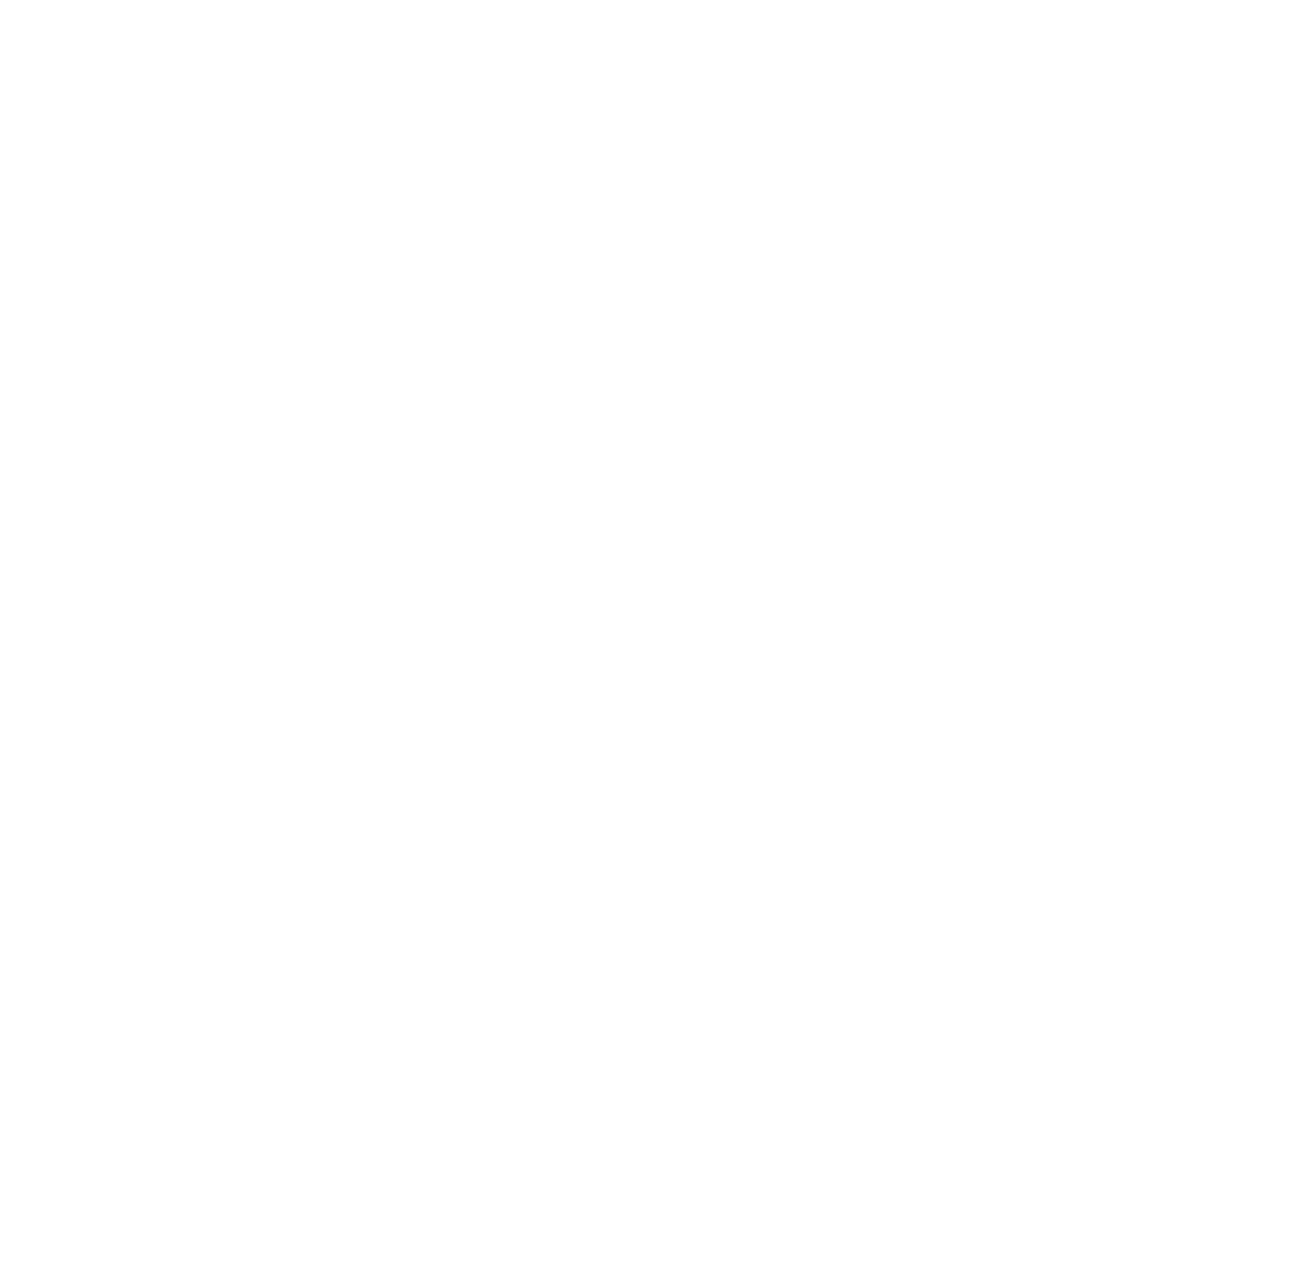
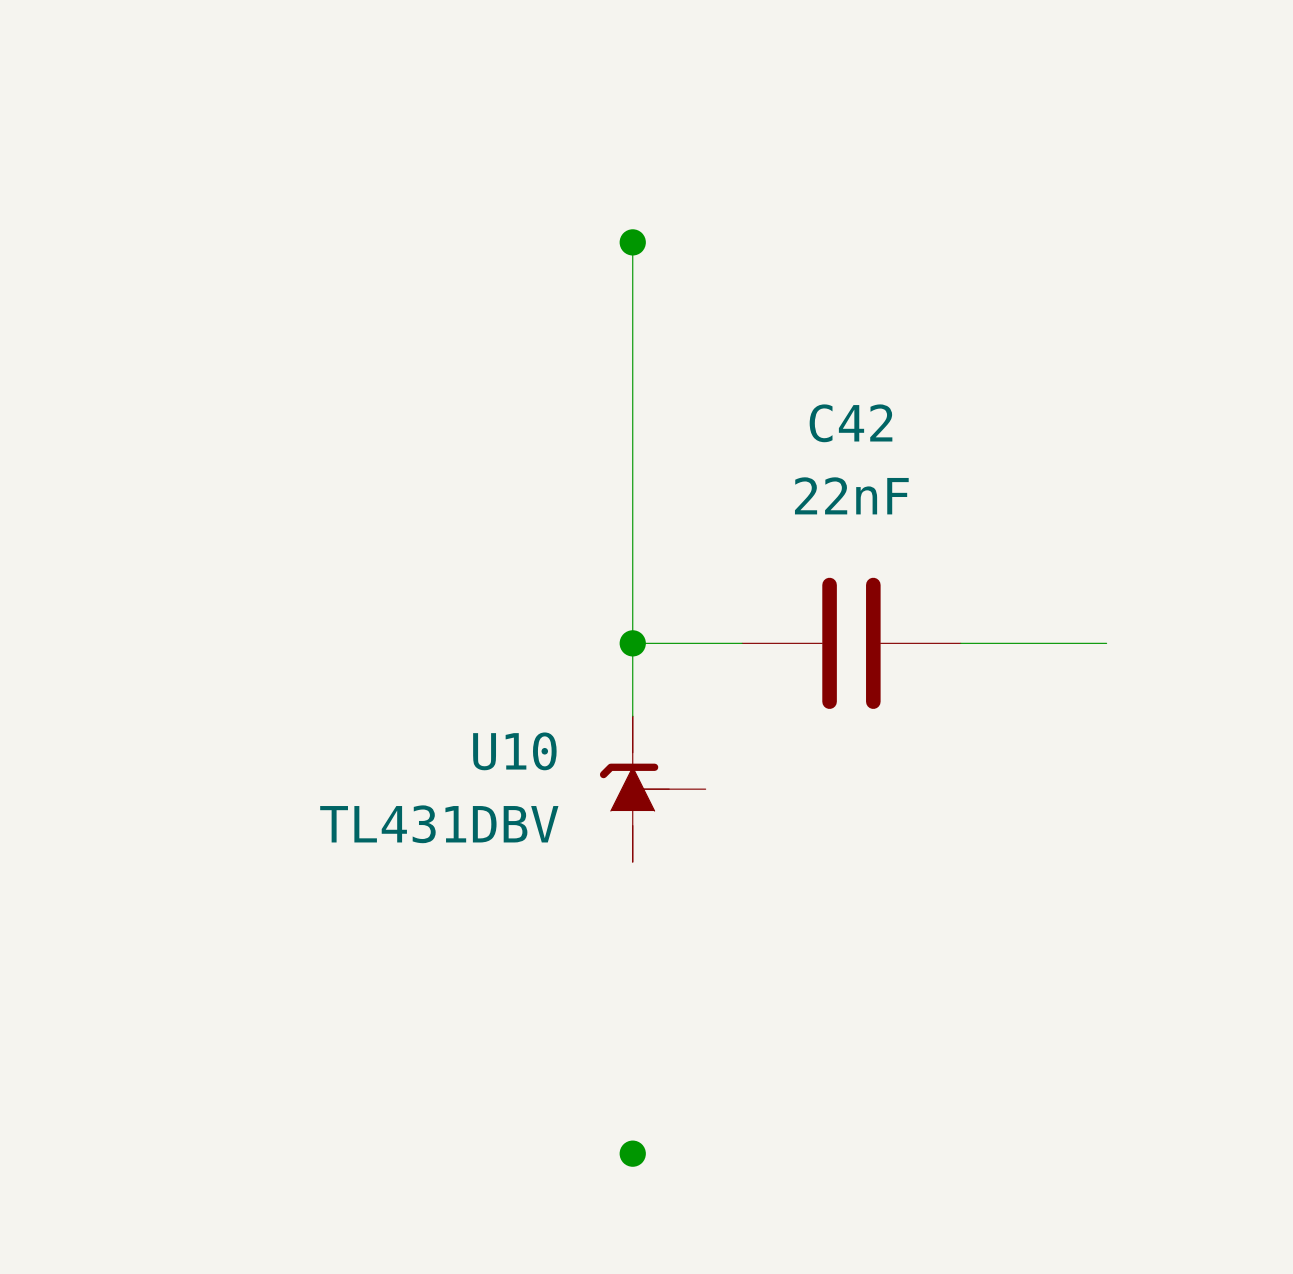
wire: none -> (632, 242) (632, 716)
junction: none -> (632, 242)
wire: none -> (632, 643) (742, 643)
junction: none -> (632, 643)
C42: none -> 22nF (851, 643)
wire: none -> (960, 643) (1106, 643)
U10: none -> TL431DBV (652, 789)
junction: none -> (632, 1153)

